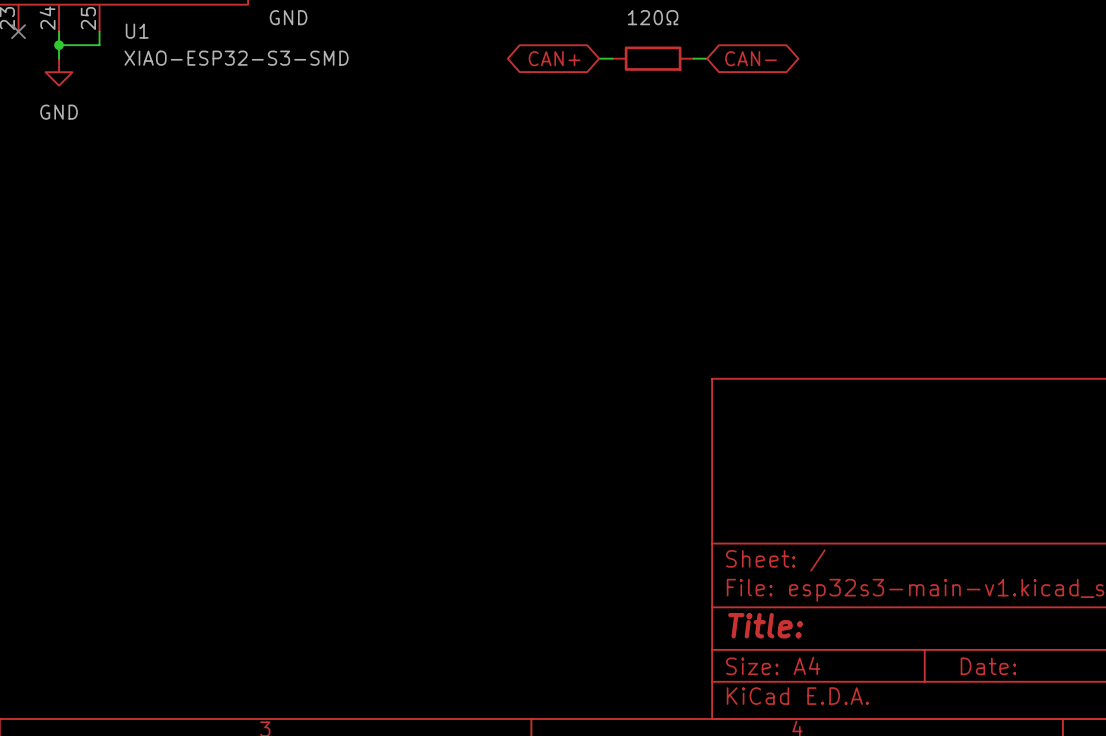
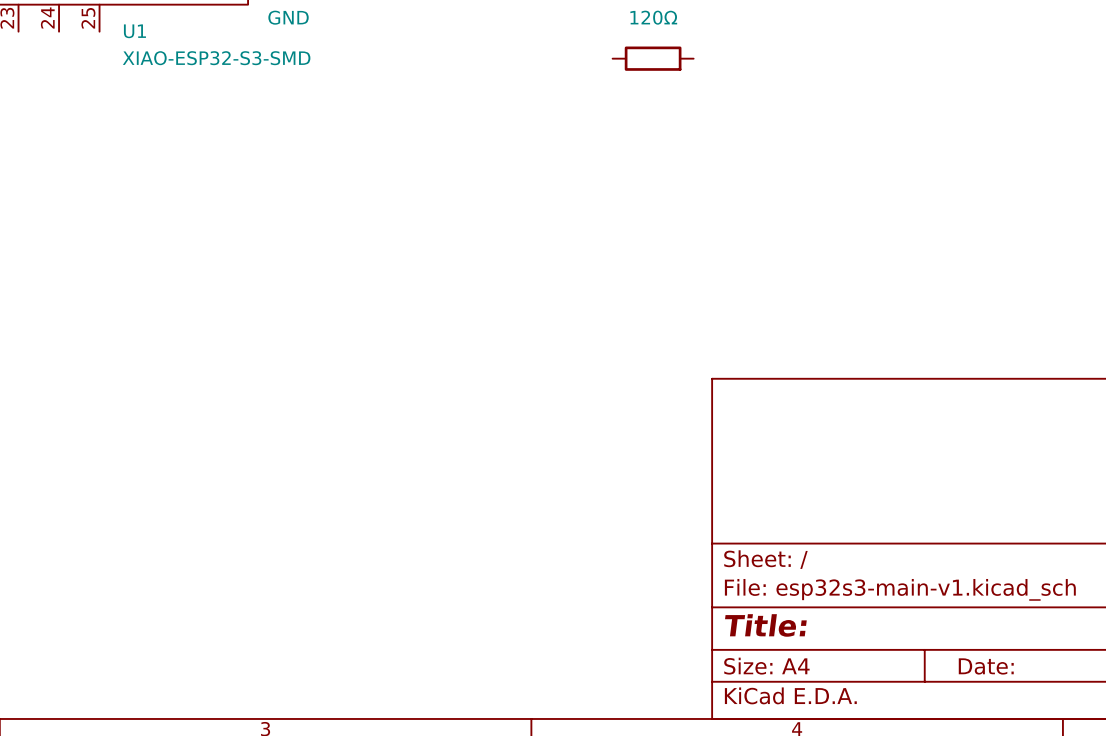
no-connect mark: (18, 31) -> none
wire: (59, 31) (59, 58) -> none
wire: (99, 31) (99, 45) (59, 45) -> none
junction: (59, 45) -> none
global label: CAN+ (554, 58) -> none
wire: (599, 58) (612, 58) -> none
wire: (693, 58) (707, 58) -> none
global label: CAN- (751, 58) -> none
power symbol: GND (59, 72) -> none

